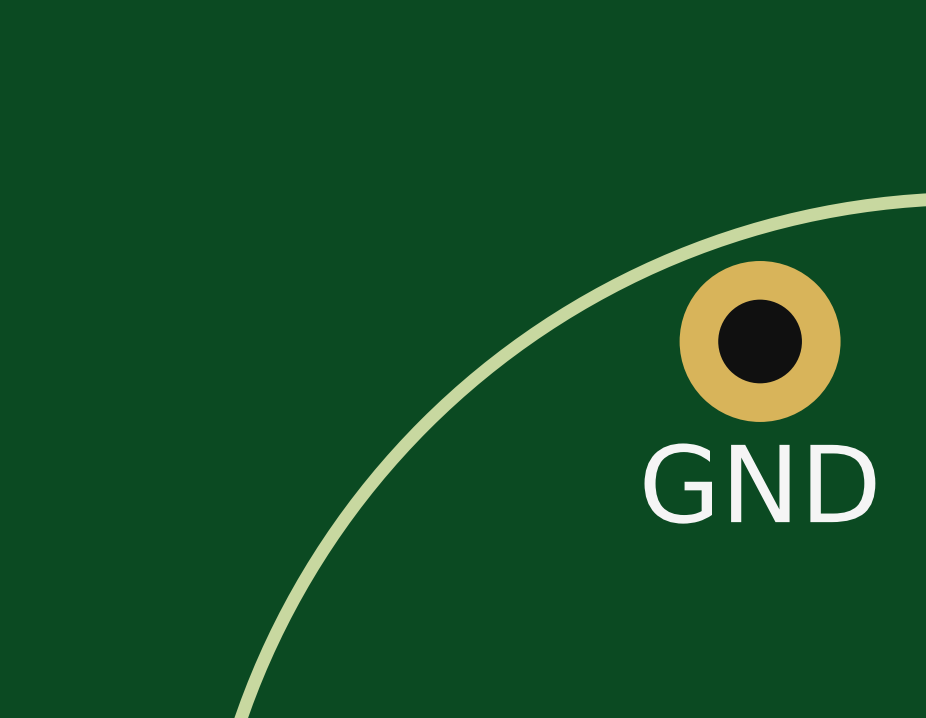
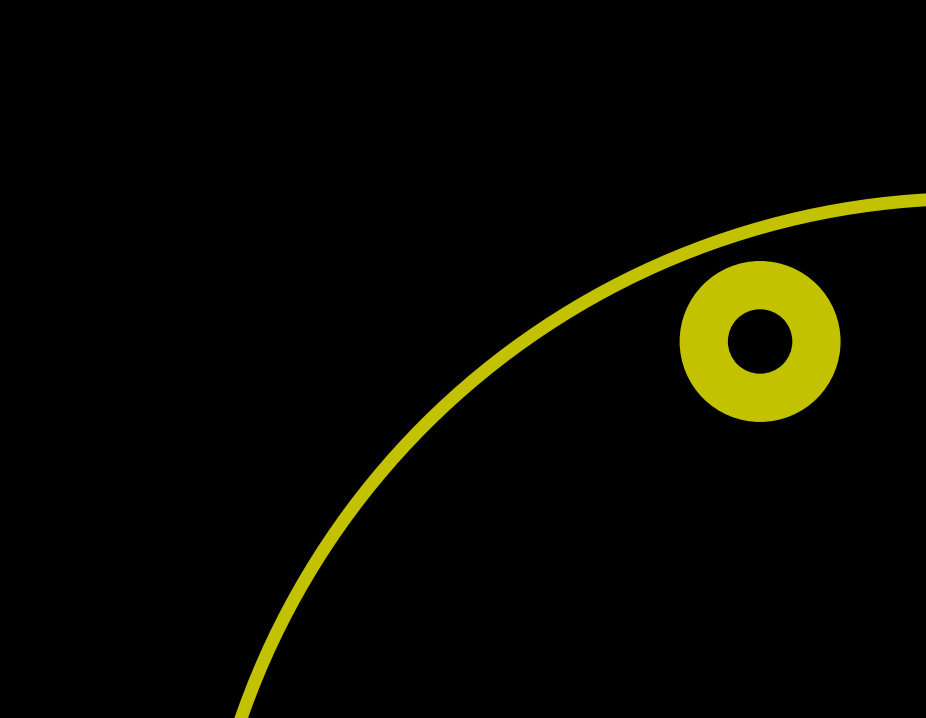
part footprint: [679, 261, 841, 422] -> [679, 261, 841, 422]
text: GND (759, 483) -> none

